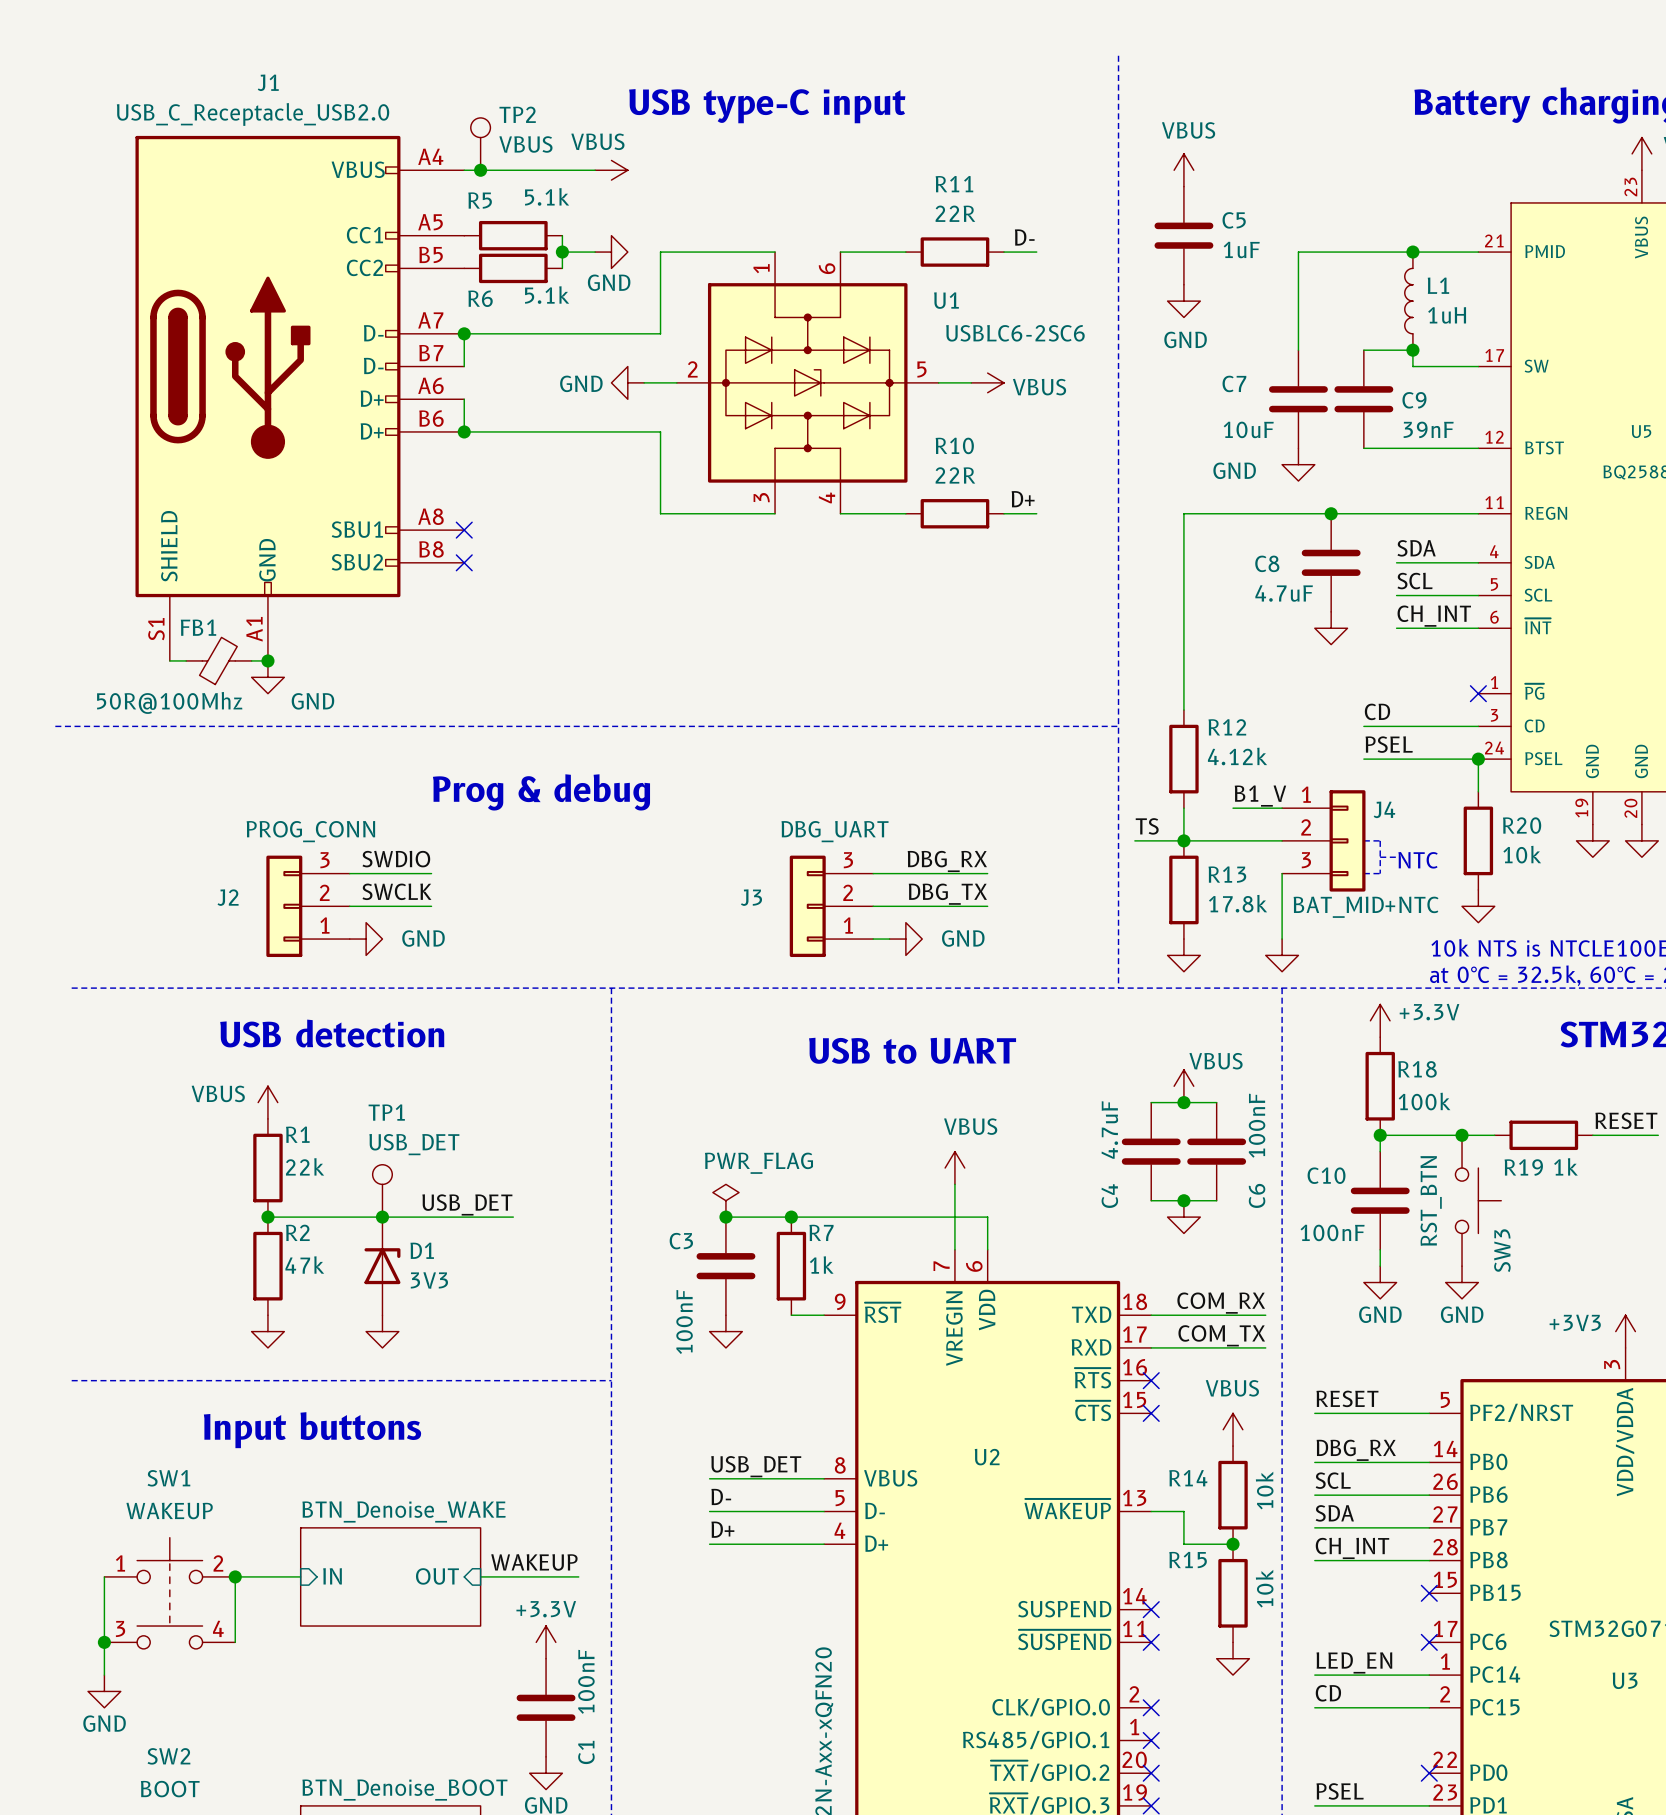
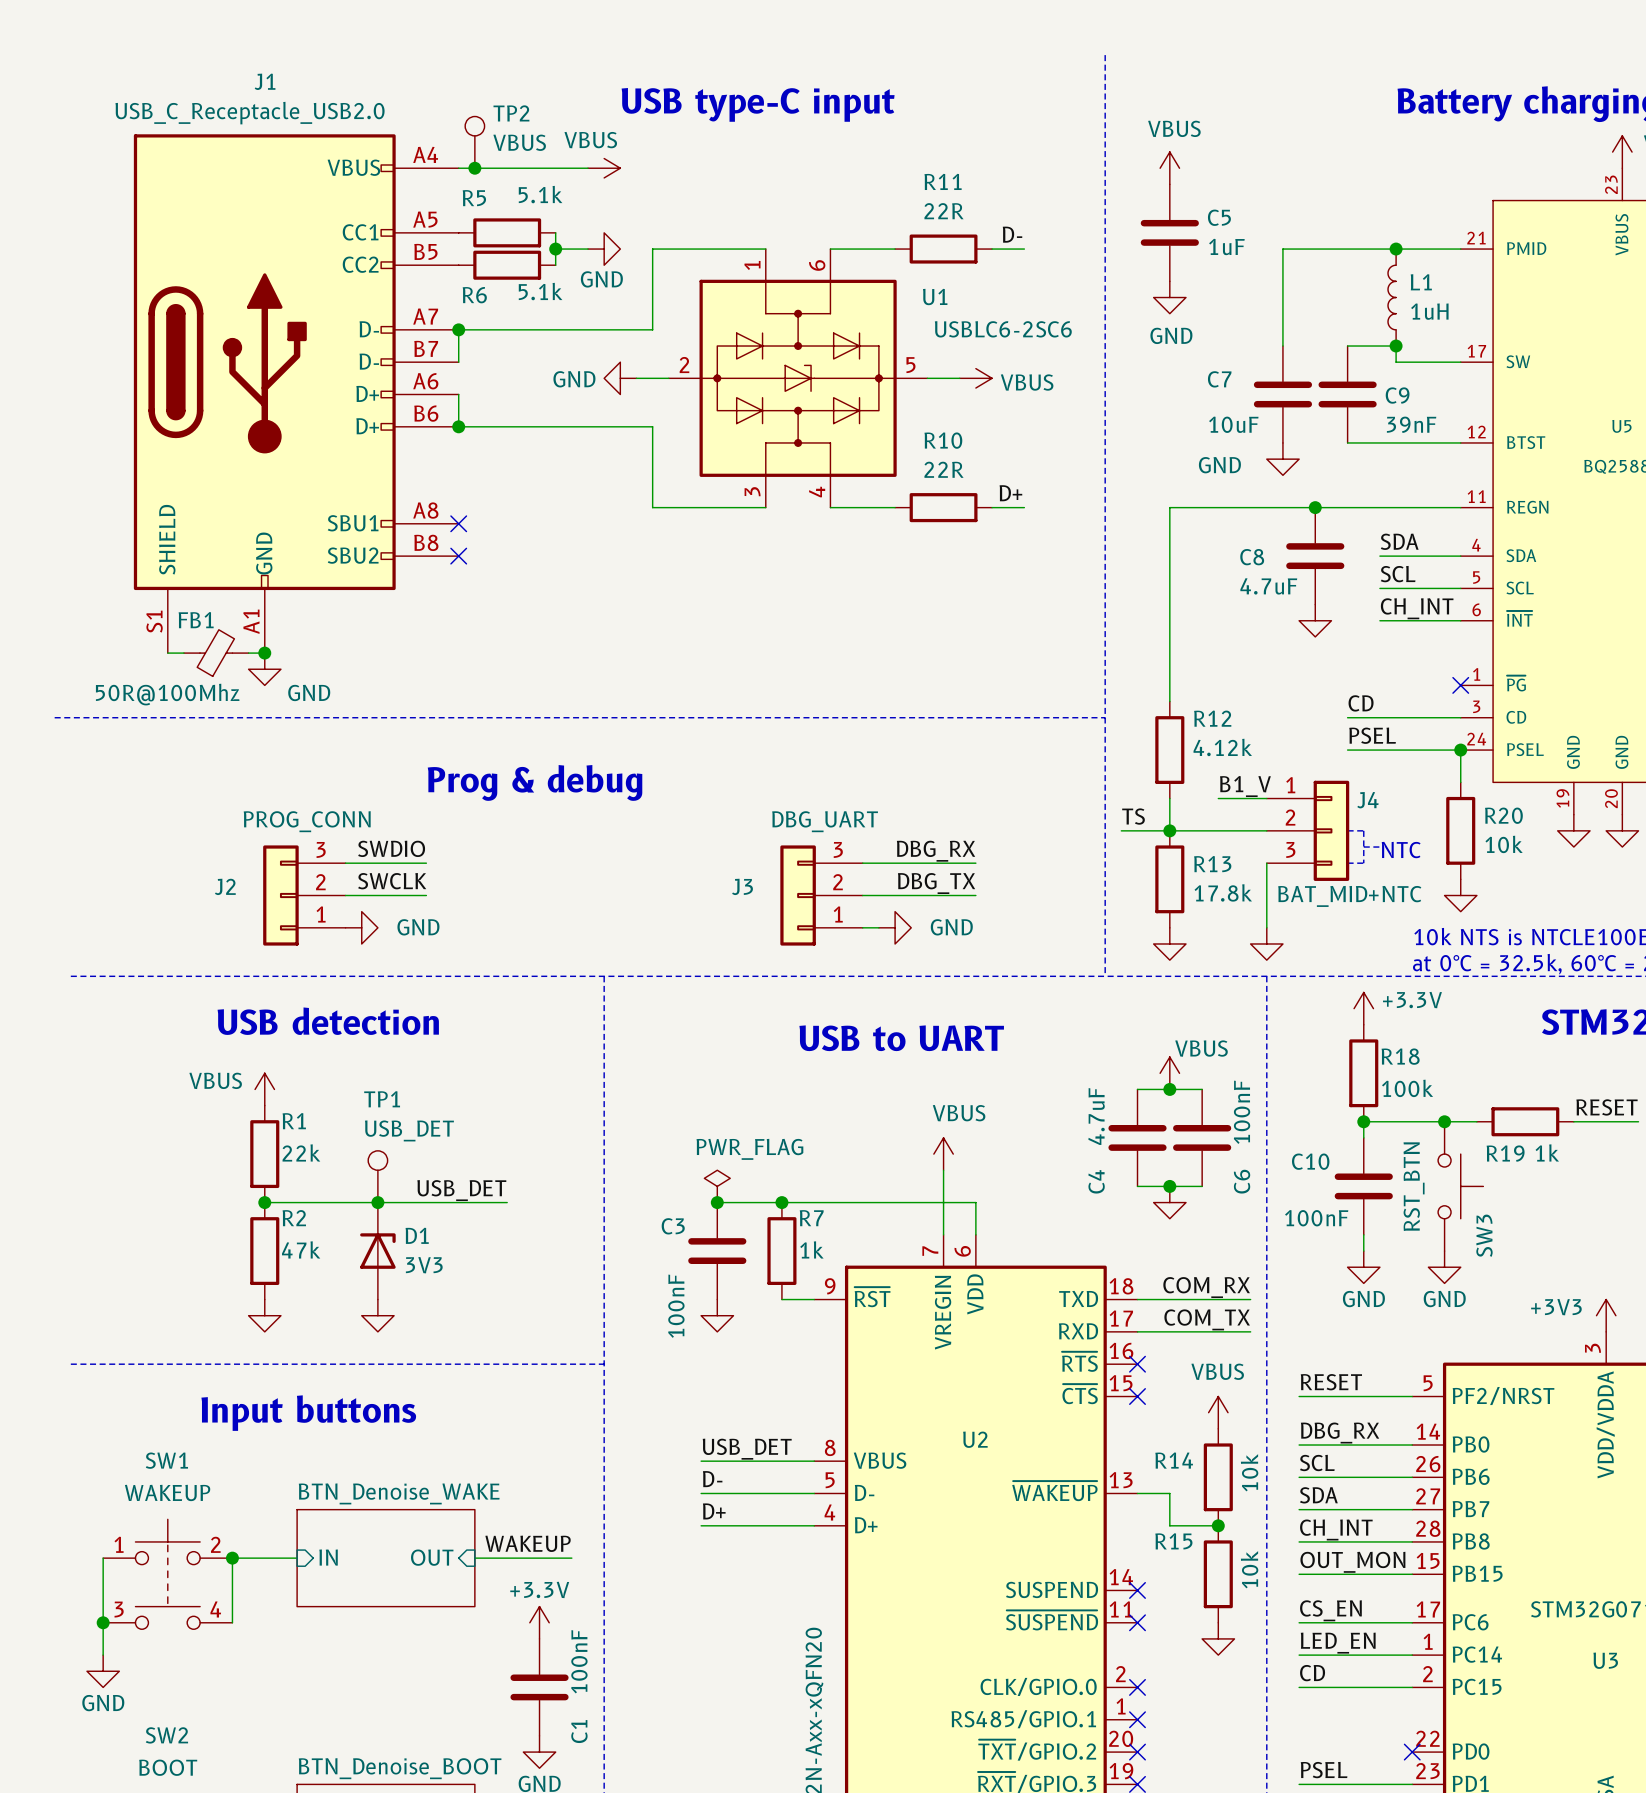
label: none -> OUT_MON (1352, 1562)
wire: none -> (1299, 1574) (1412, 1574)
no-connect mark: (1429, 1593) -> none
label: none -> CS_EN (1330, 1610)
wire: none -> (1299, 1622) (1412, 1622)
no-connect mark: (1429, 1642) -> none

